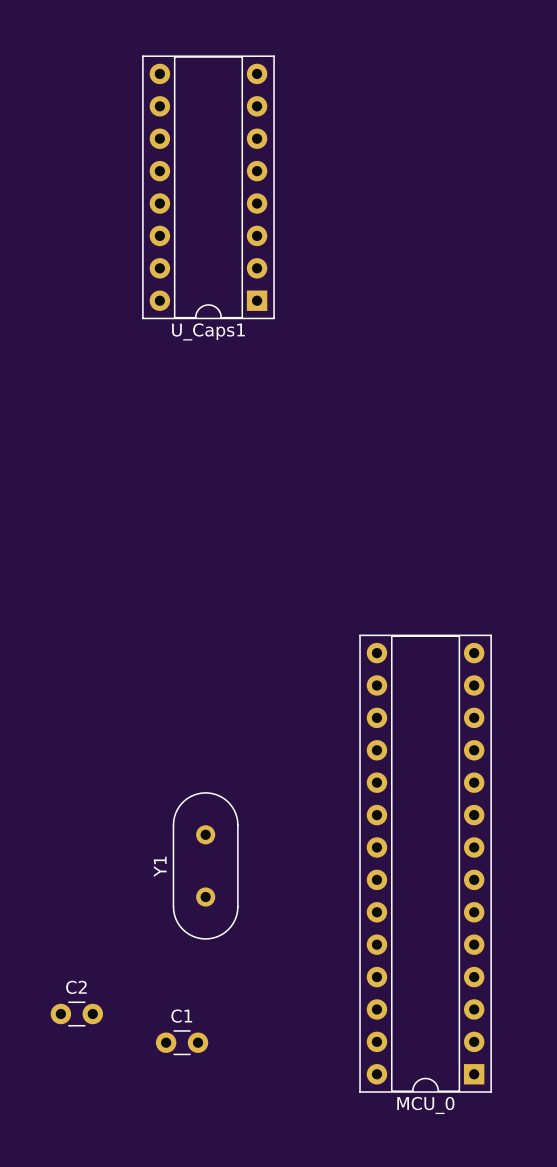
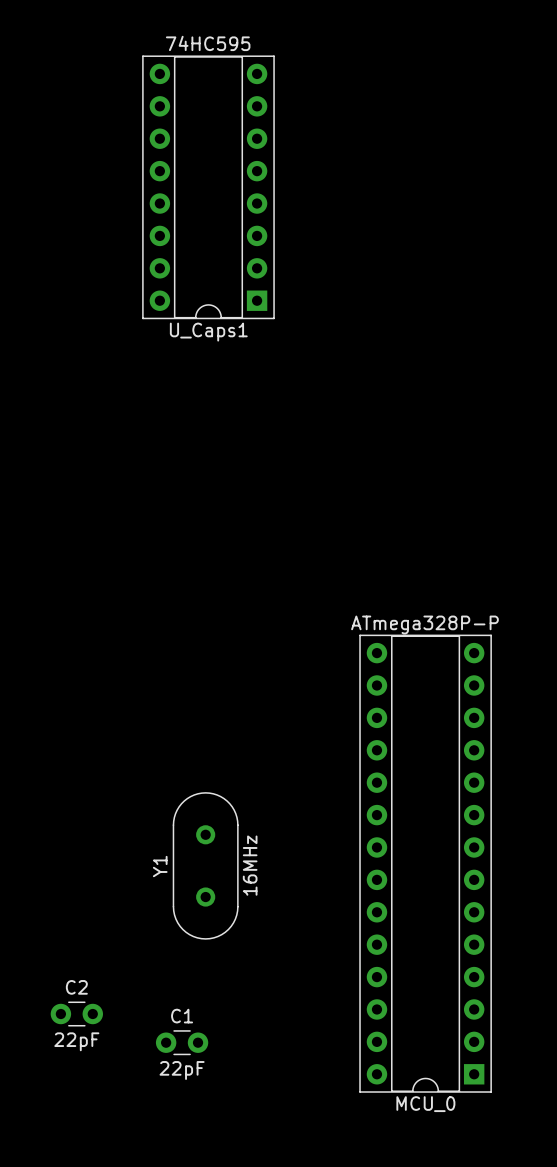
U_Caps1 value: none -> 74HC595 (208, 43)
MCU_0 value: none -> ATmega328P-P (424, 625)
Y1 value: none -> 16MHz (250, 865)
C2 value: none -> 22pF (76, 1041)
C1 value: none -> 22pF (182, 1070)

